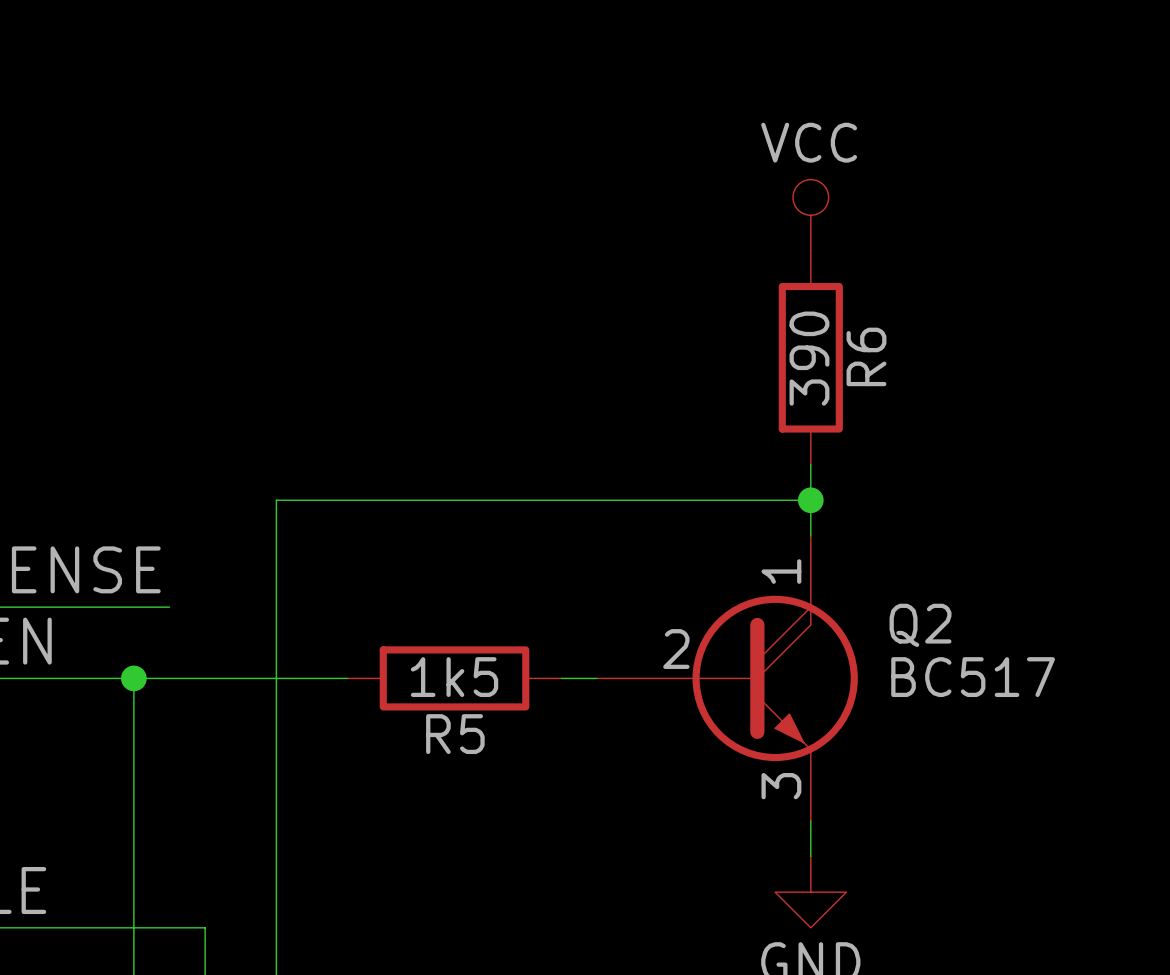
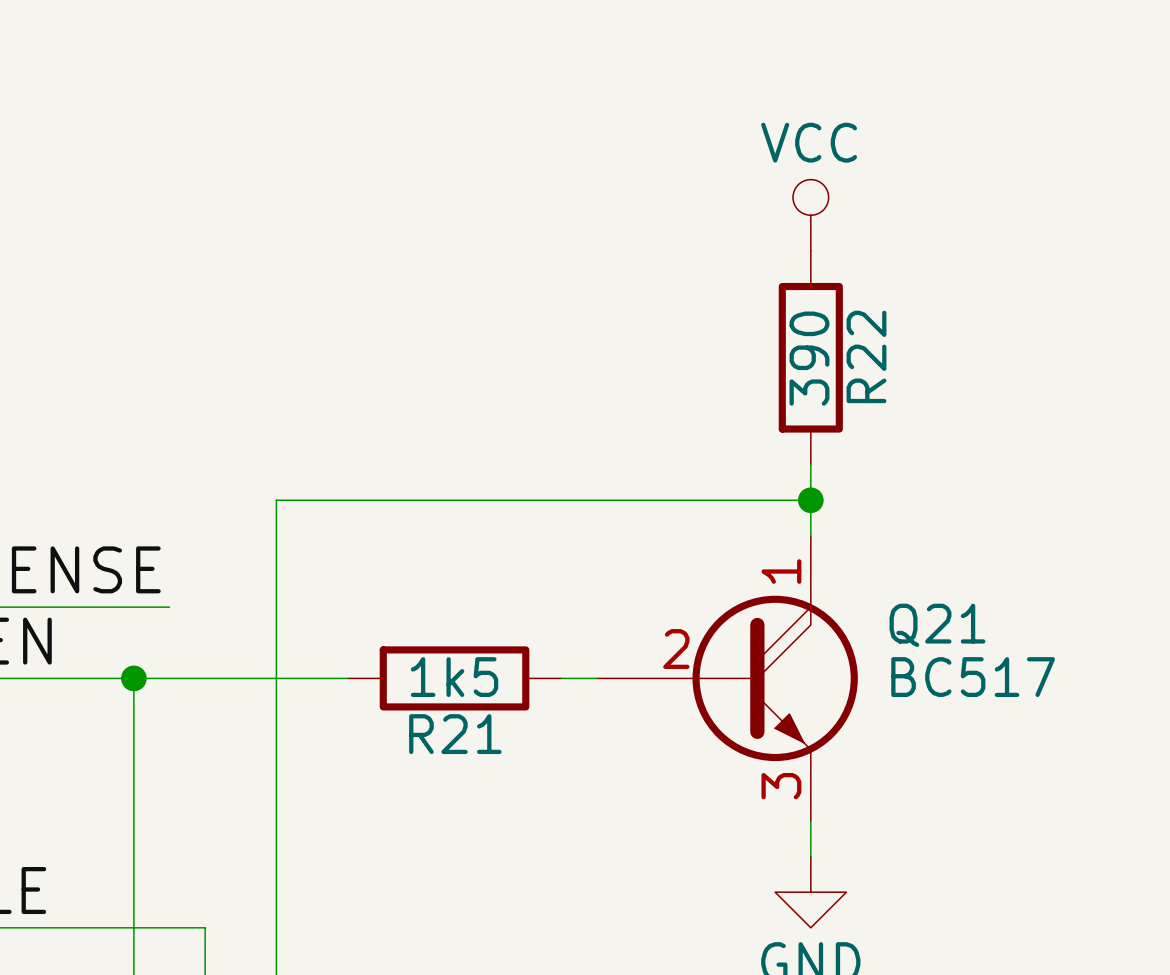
R6 name: R6 (866, 356) -> R22 (866, 356)
Q2 name: Q2 (920, 625) -> Q21 (937, 625)
R5 name: R5 (455, 734) -> R21 (455, 734)

